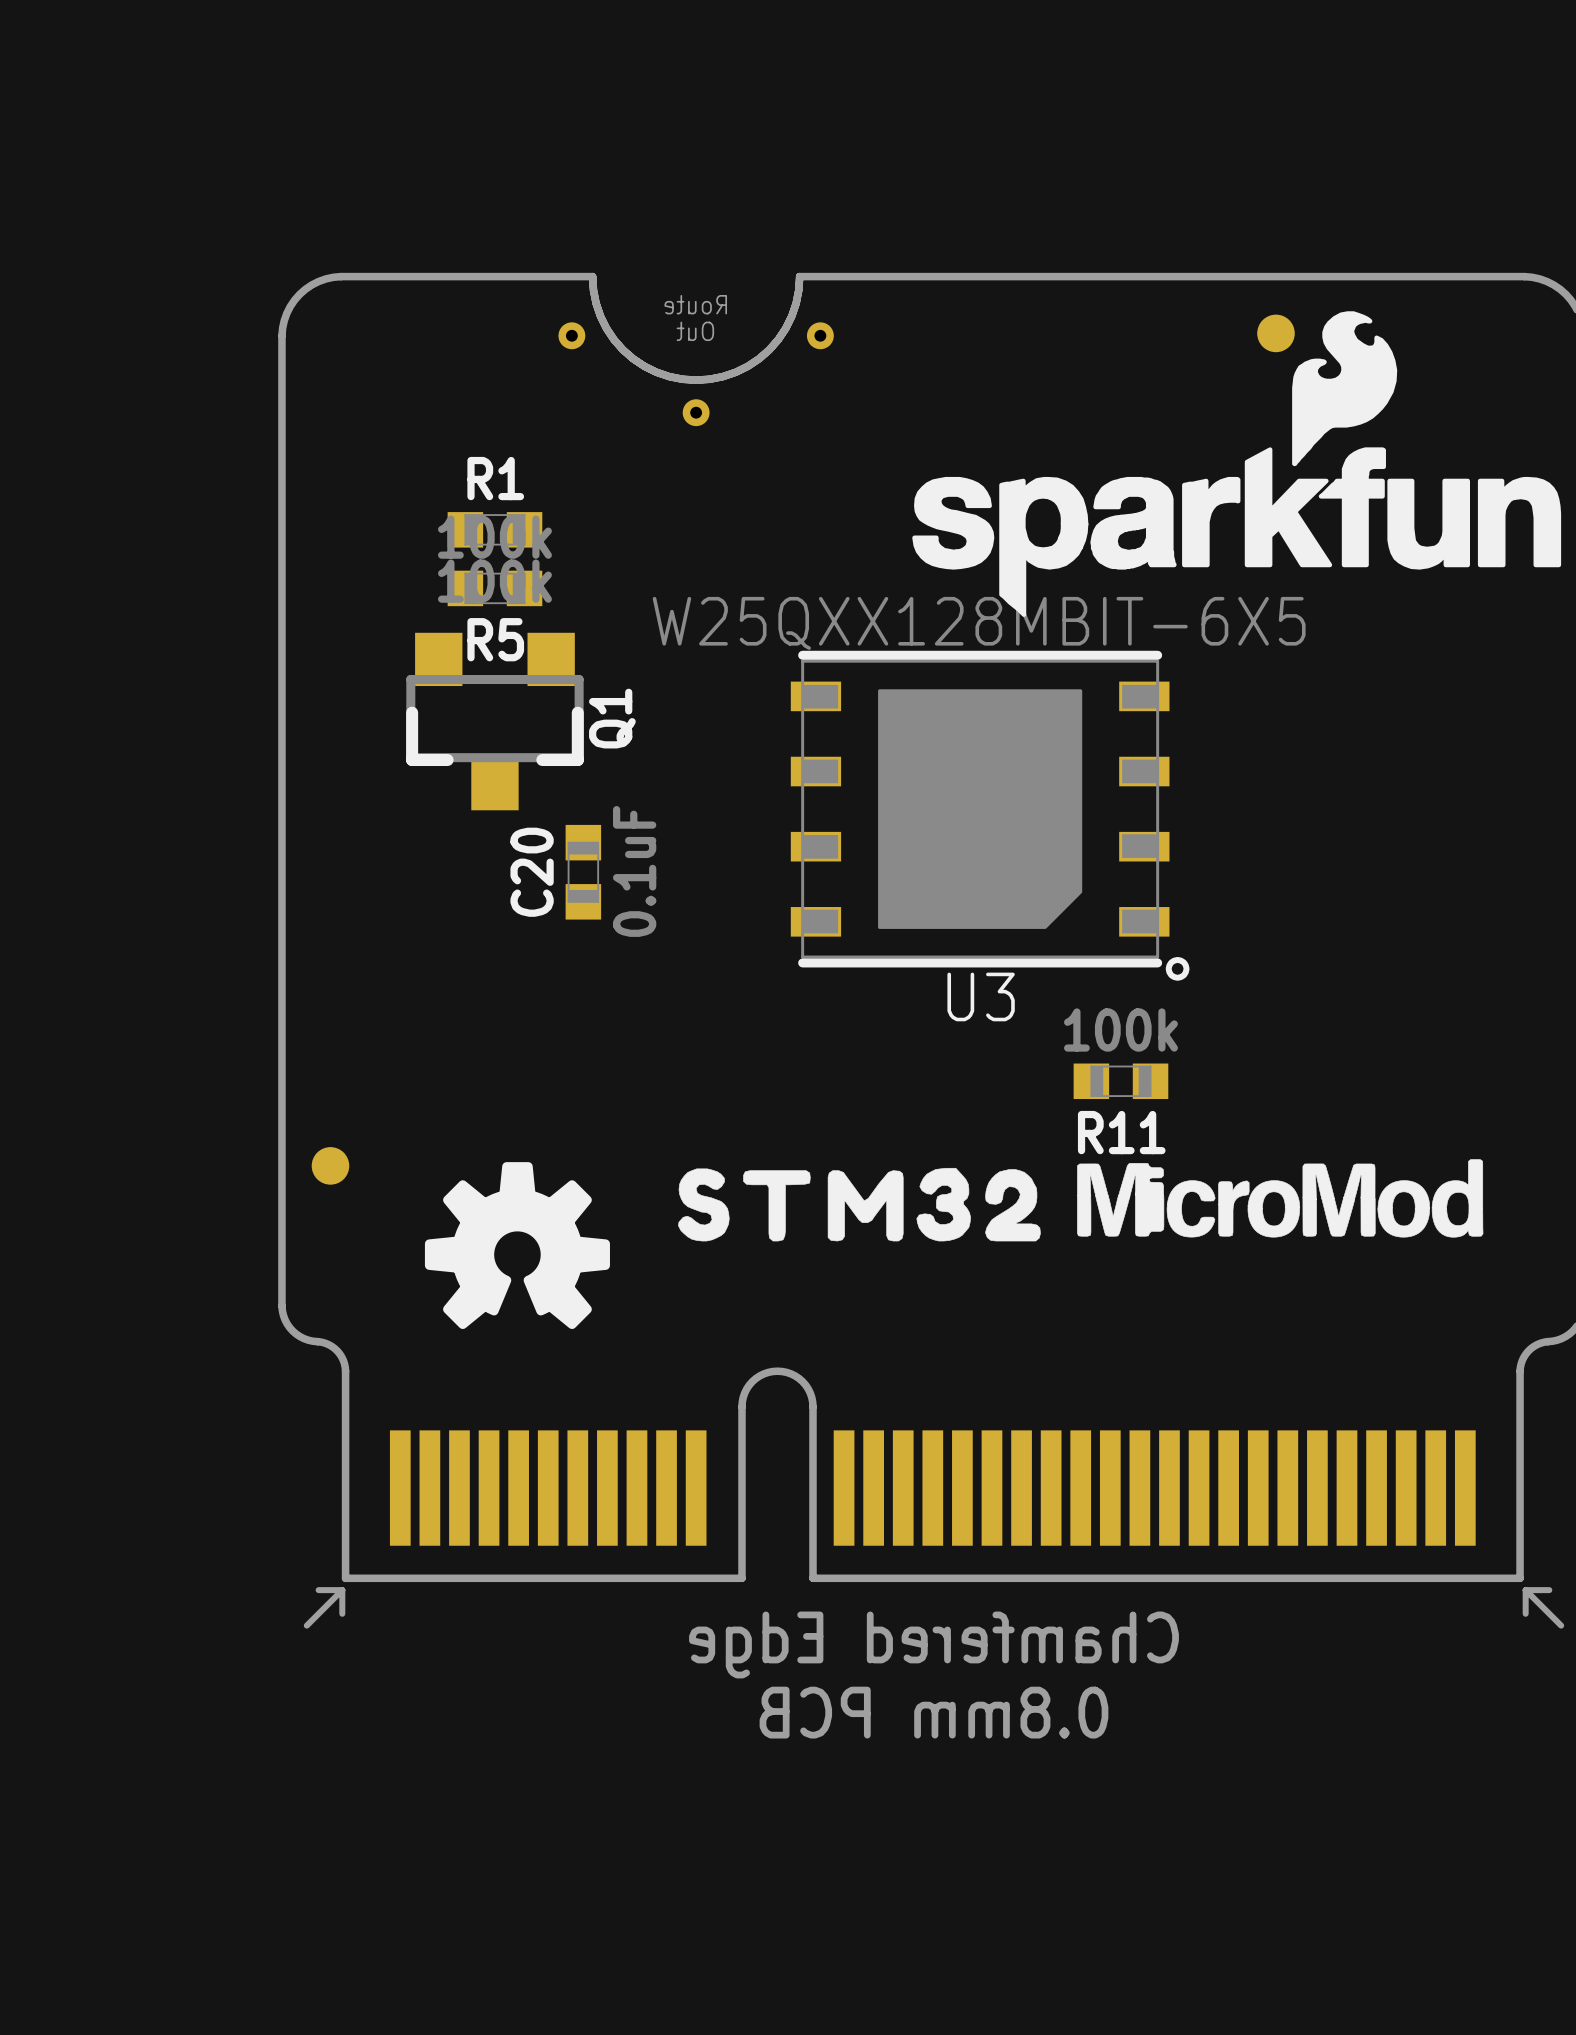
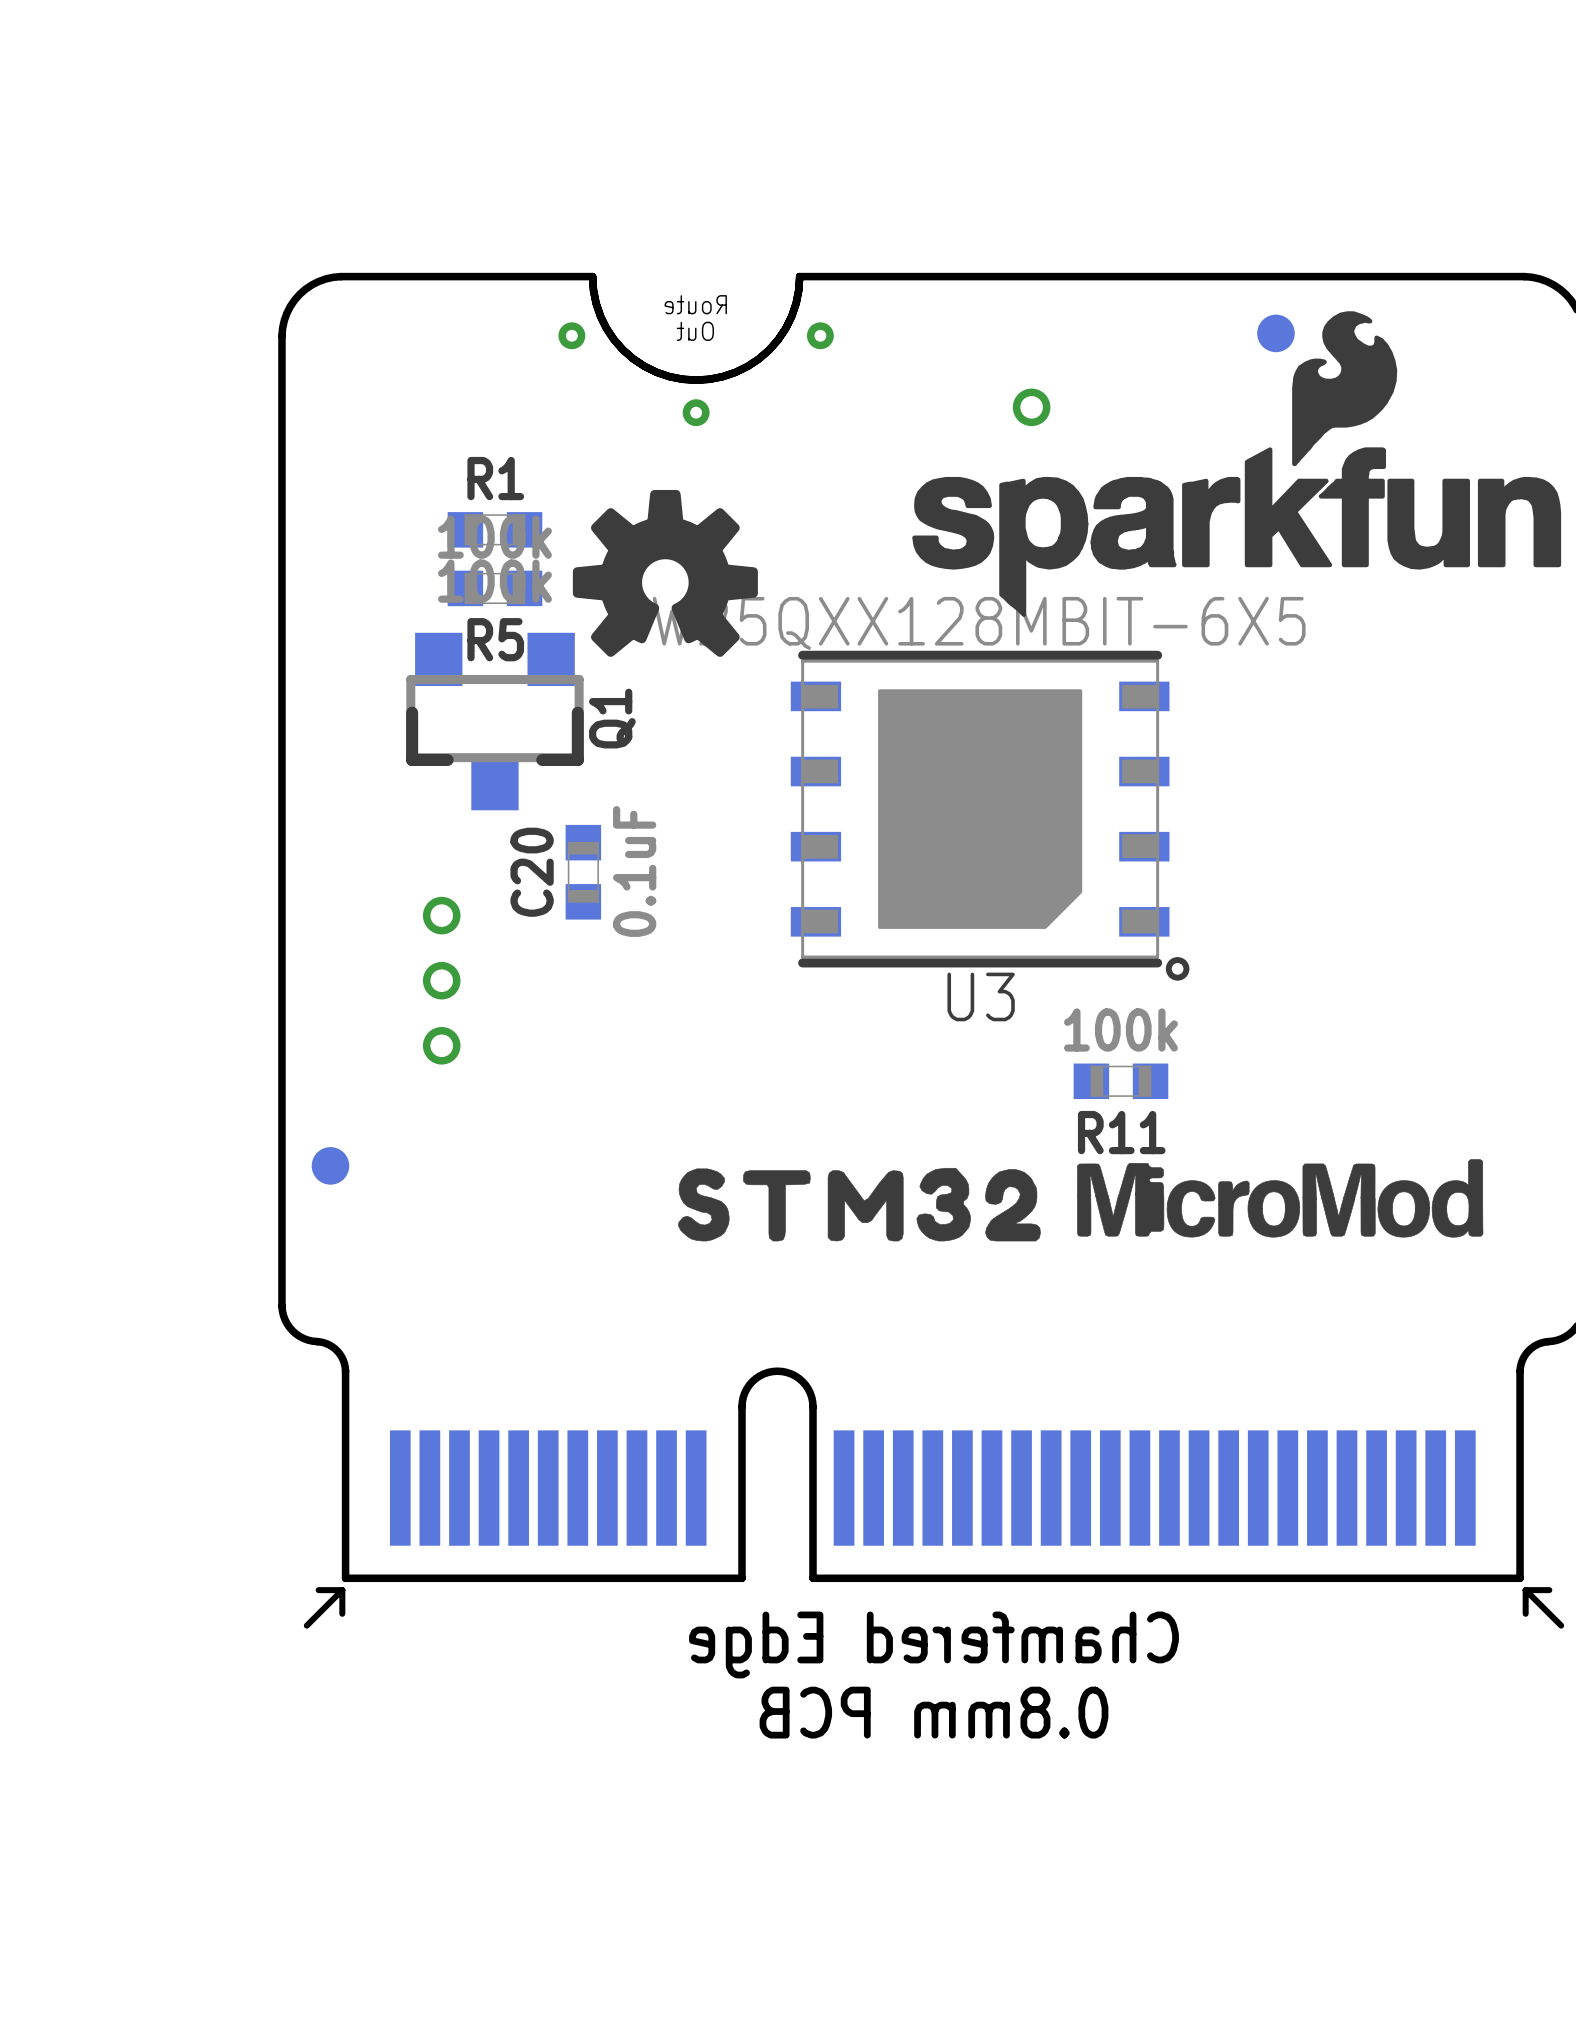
part: none -> (1031, 407)
part: none -> (441, 915)
part: none -> (441, 980)
part: none -> (441, 1045)
drawing position: (517, 1245) -> (665, 573)

